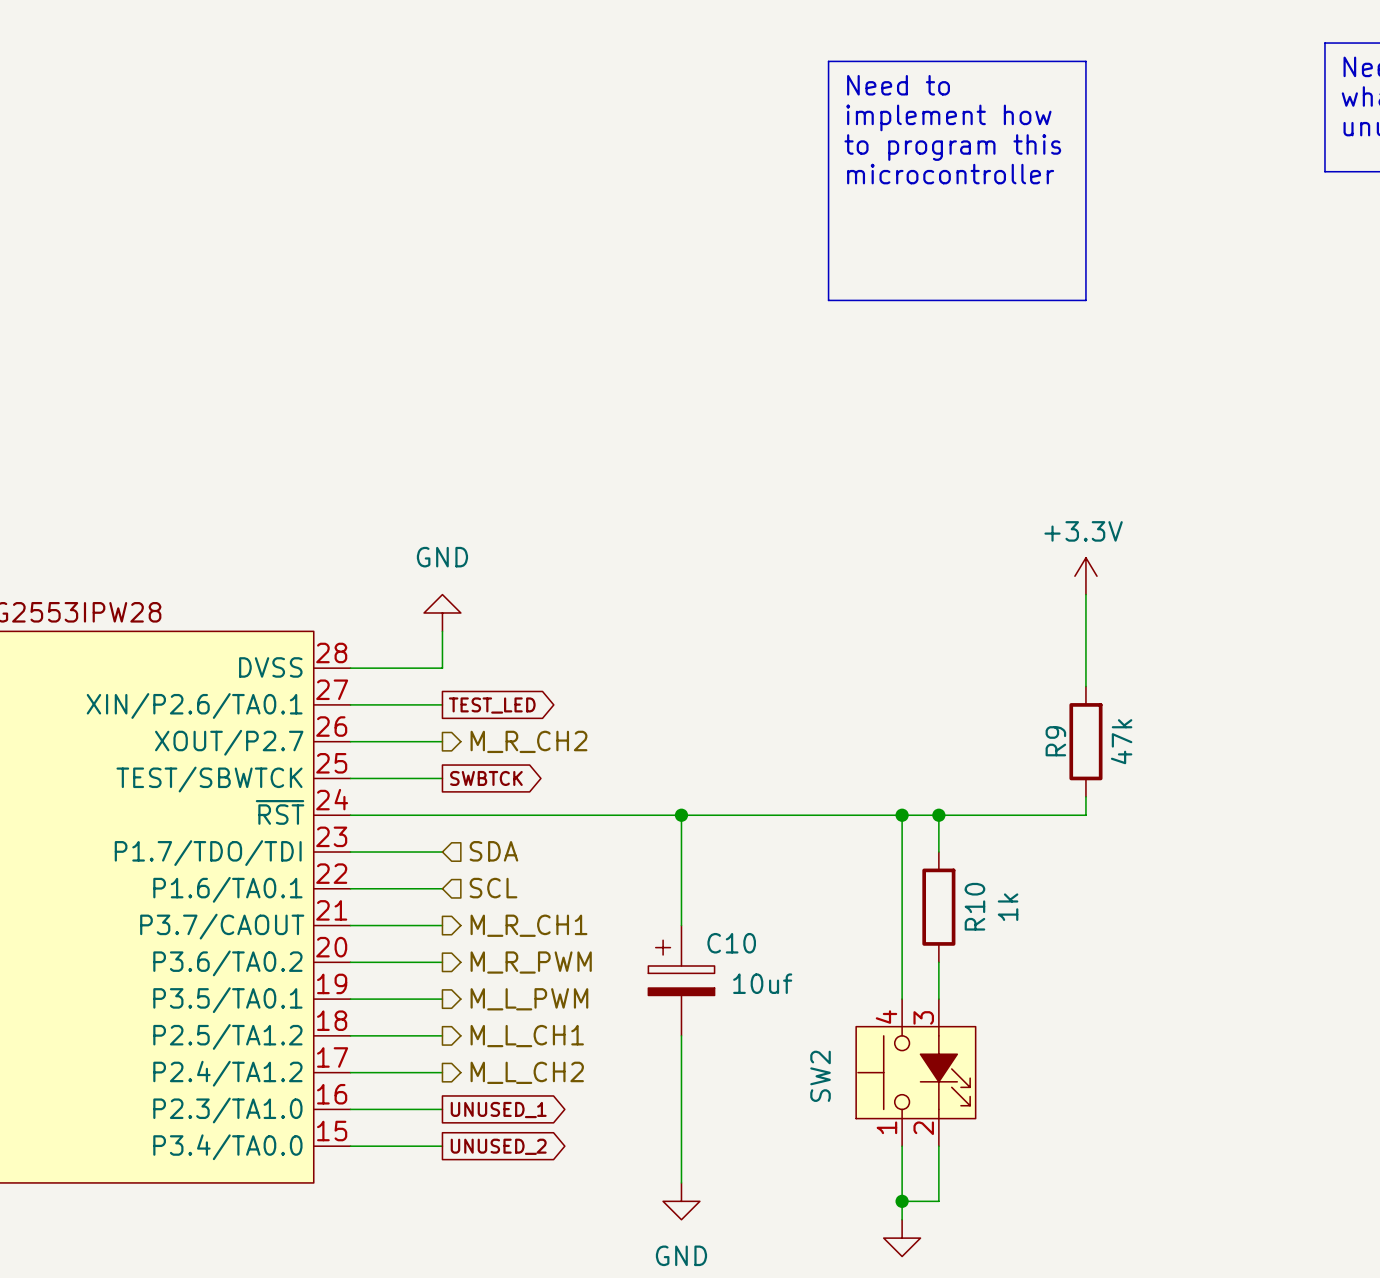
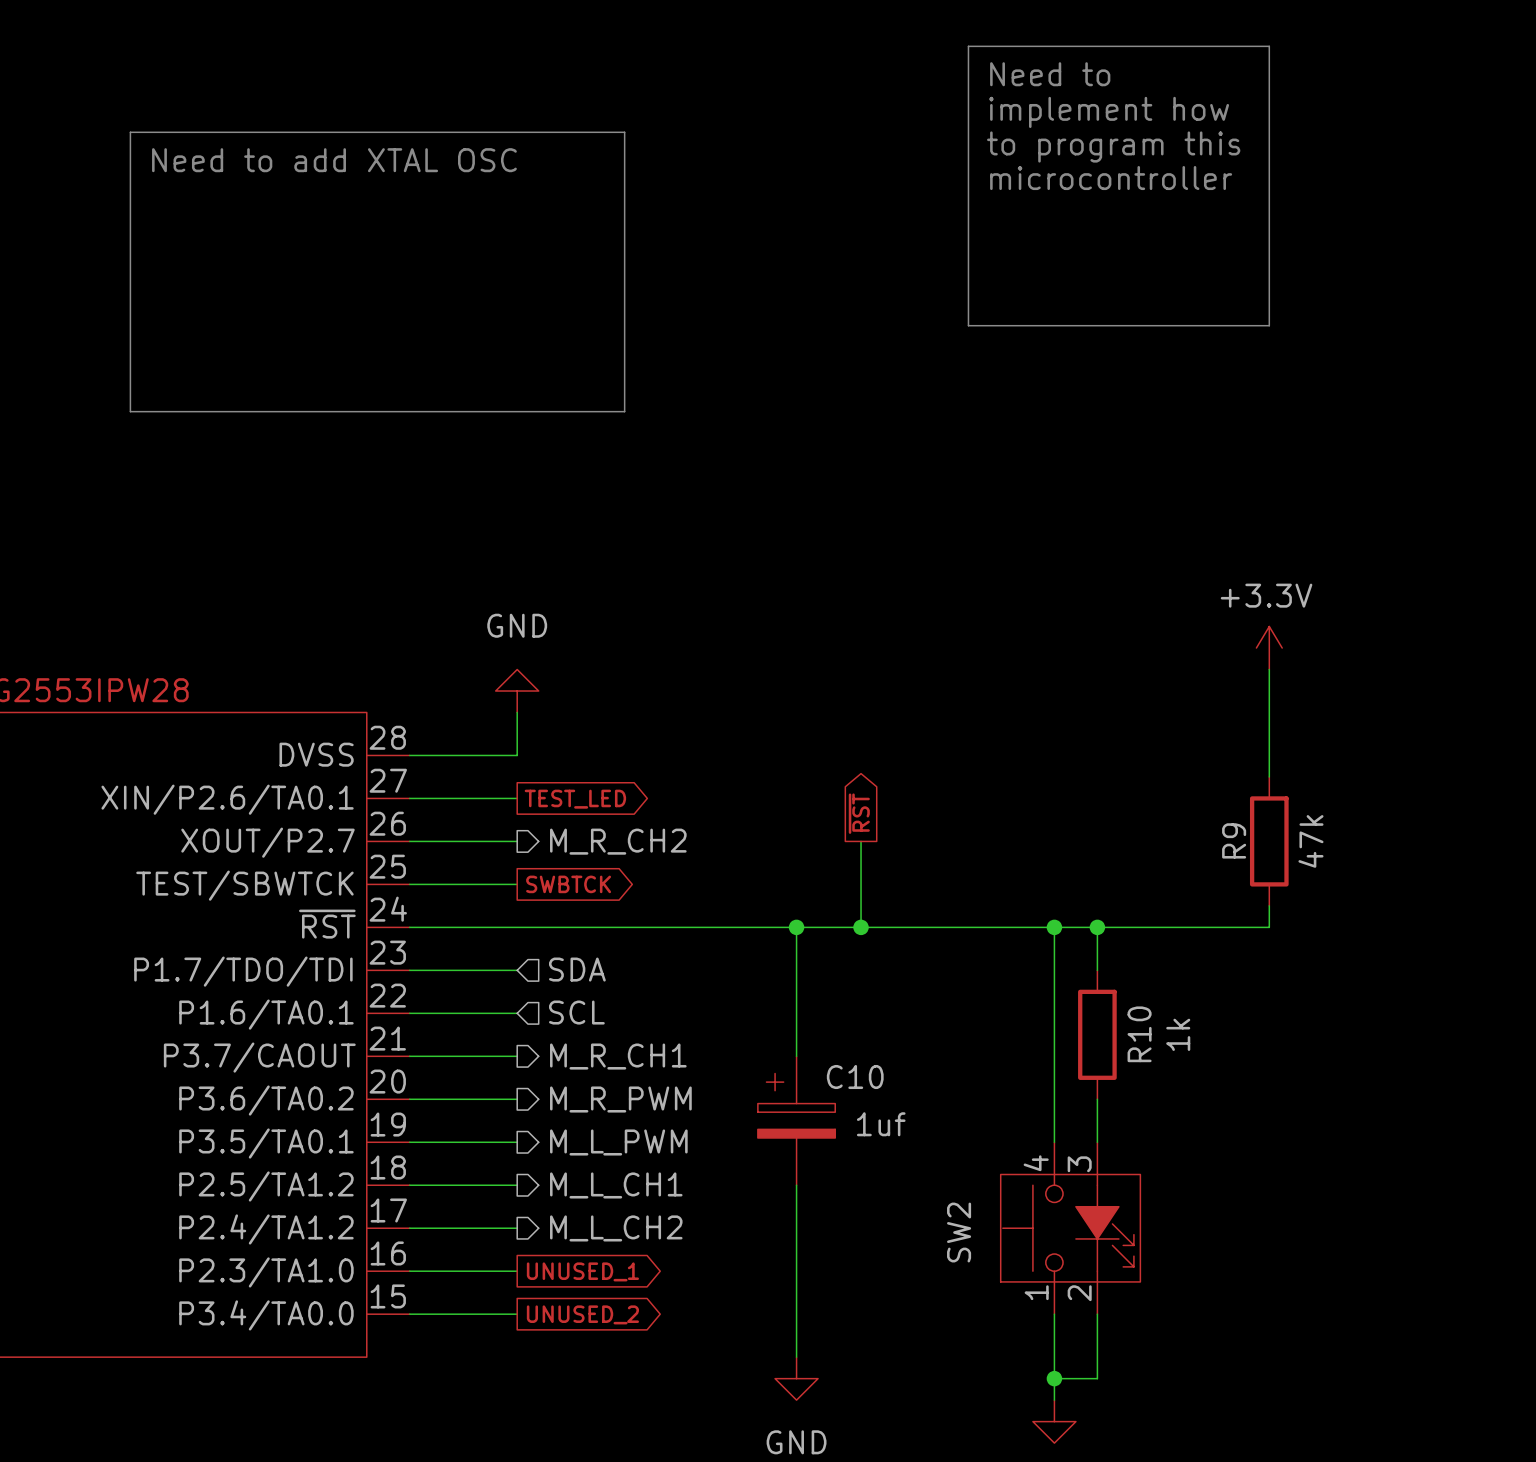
line: none -> (130, 132) (624, 132) (624, 411) (130, 411) (130, 132)
text: none -> Need to add XTAL OSC (334, 160)
global label: none -> ~{RST} (859, 813)
wire: none -> (861, 841) (861, 927)
junction: none -> (861, 927)
C10 value: 10uf (762, 983) -> 1uf (881, 1124)

